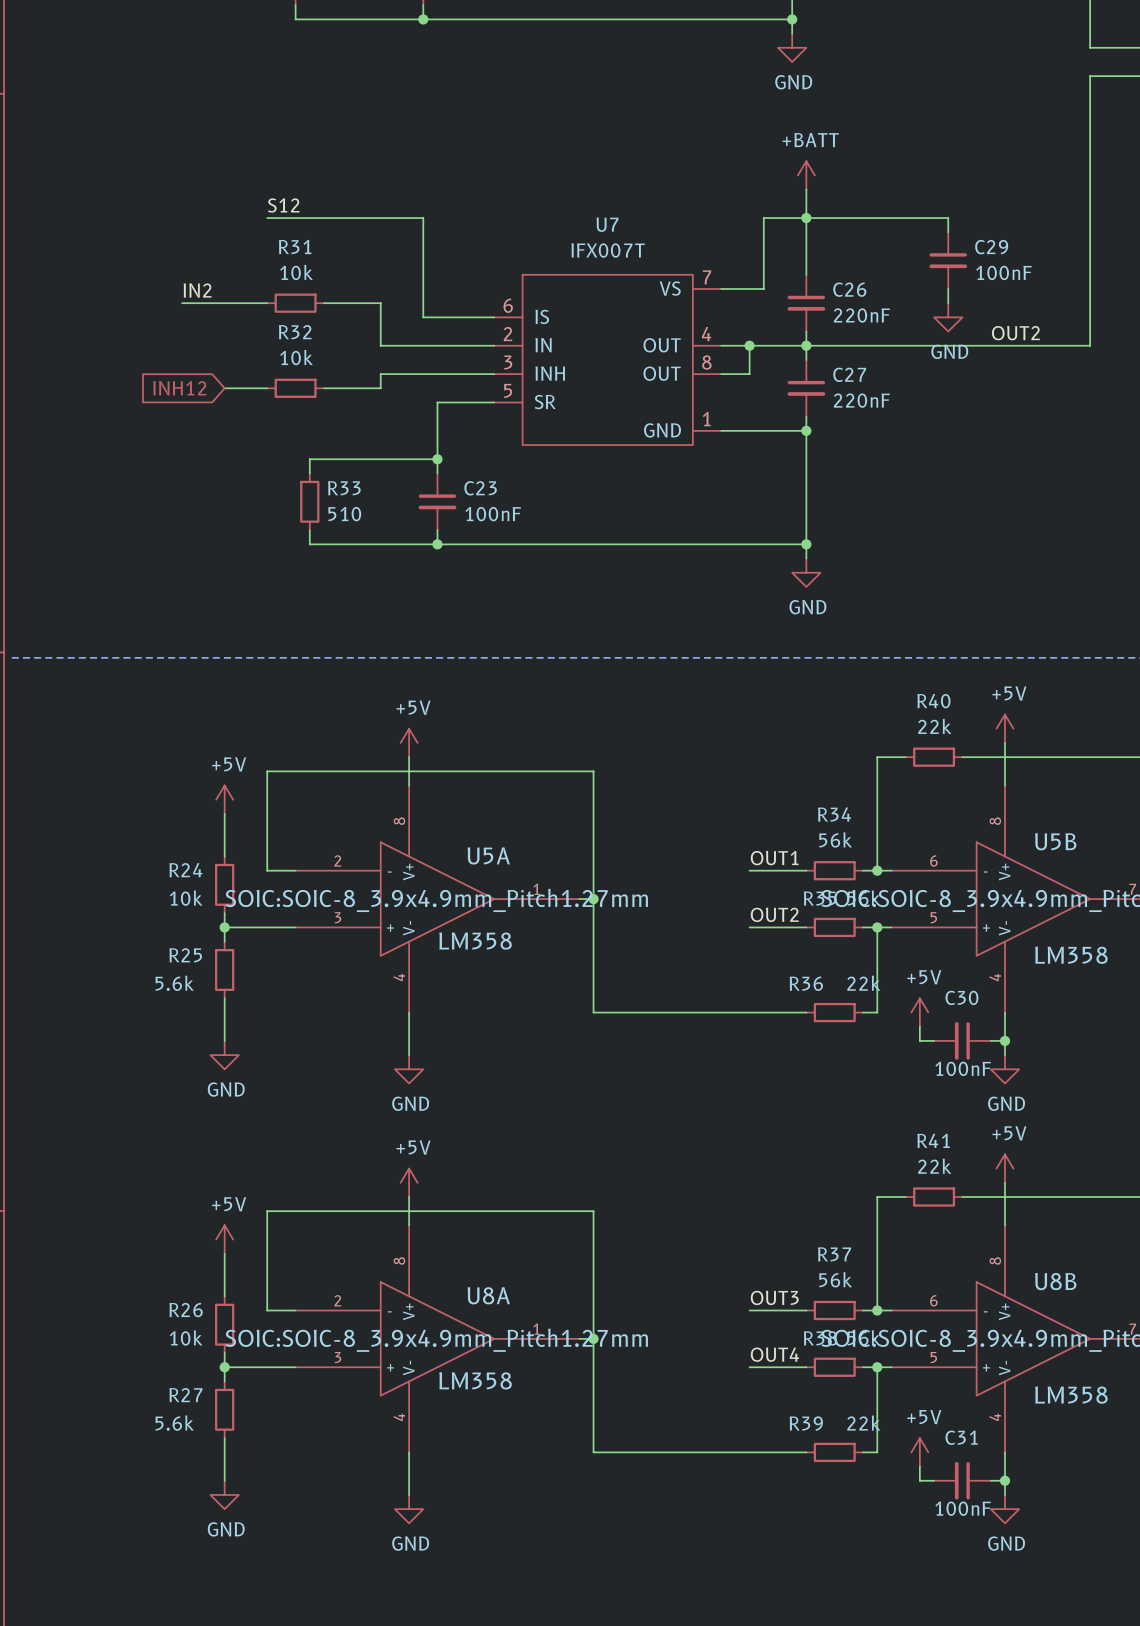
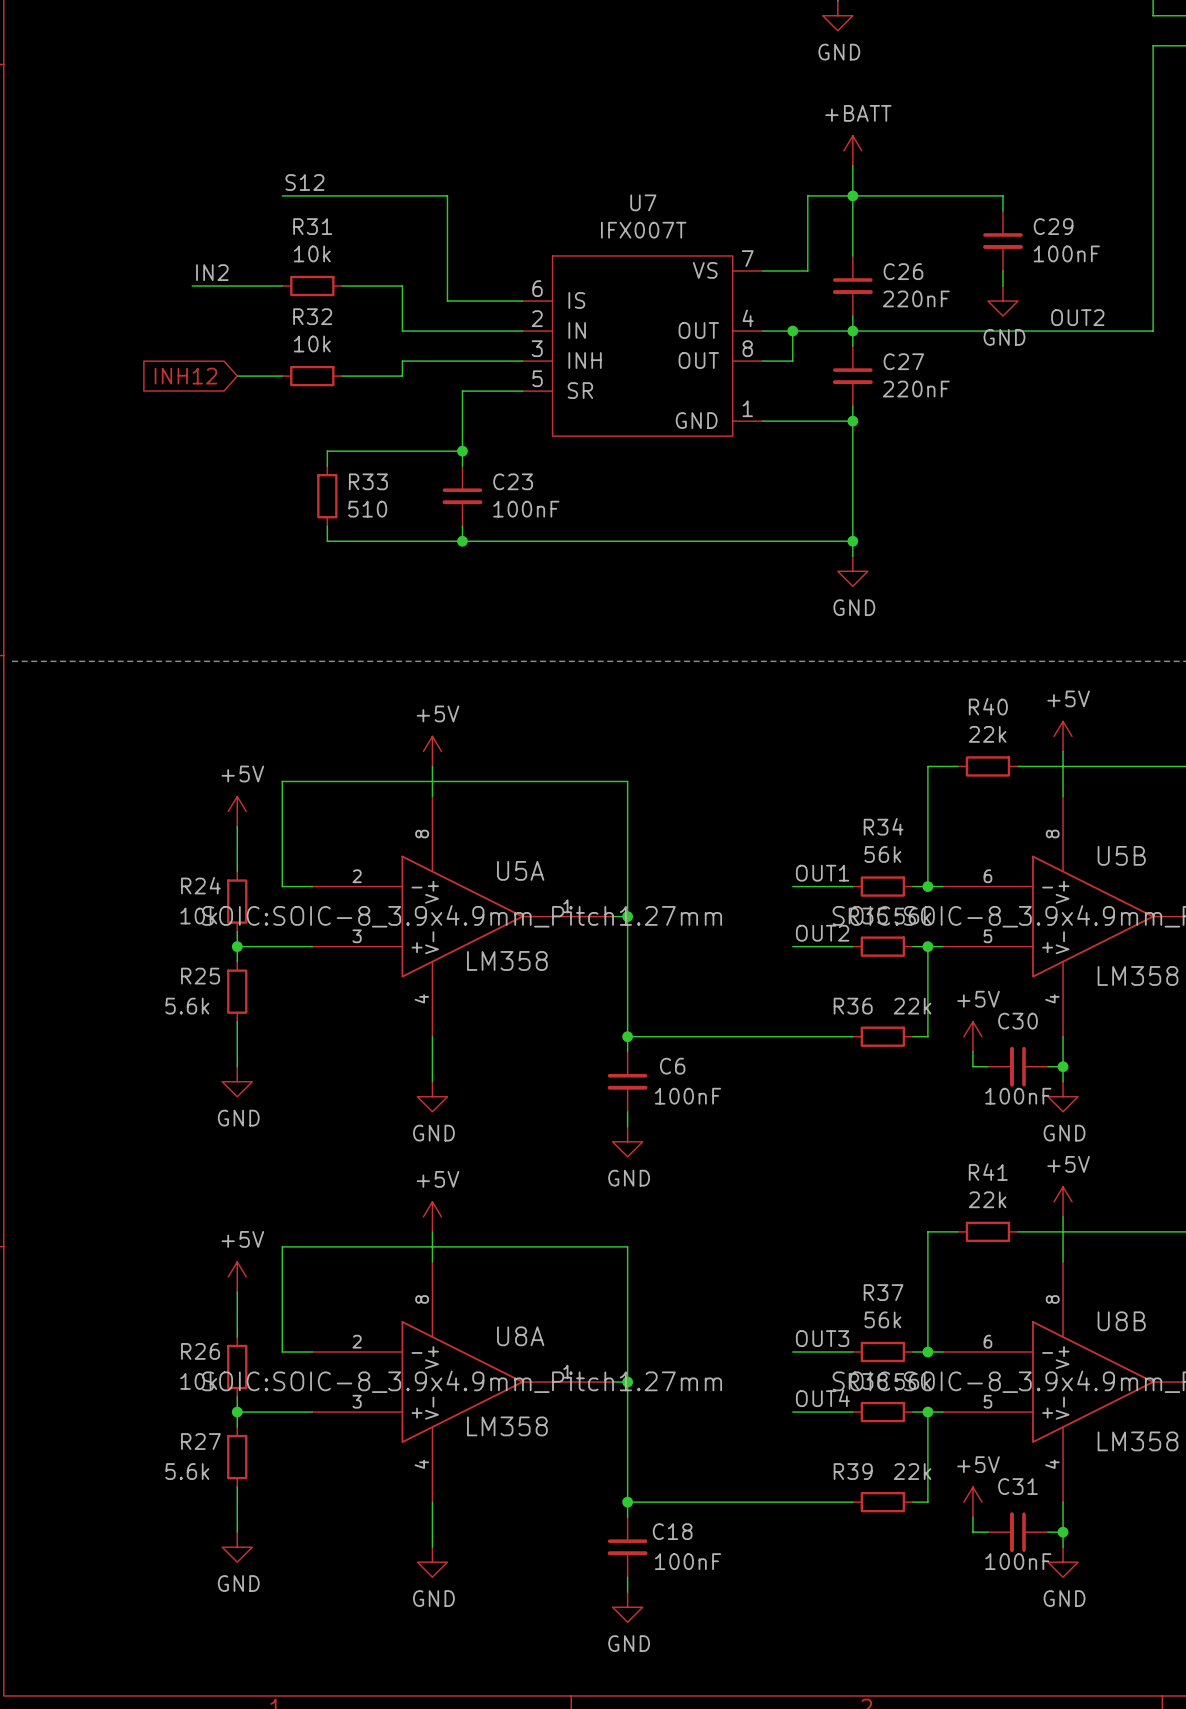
wire: none -> (627, 1036) (627, 1051)
junction: none -> (627, 1036)
C6: none -> 100nF (627, 1081)
wire: none -> (627, 1111) (627, 1126)
power symbol: none -> GND (627, 1141)
wire: none -> (627, 1502) (627, 1517)
junction: none -> (627, 1502)
C18: none -> 100nF (627, 1547)
wire: none -> (627, 1577) (627, 1592)
power symbol: none -> GND (627, 1607)

